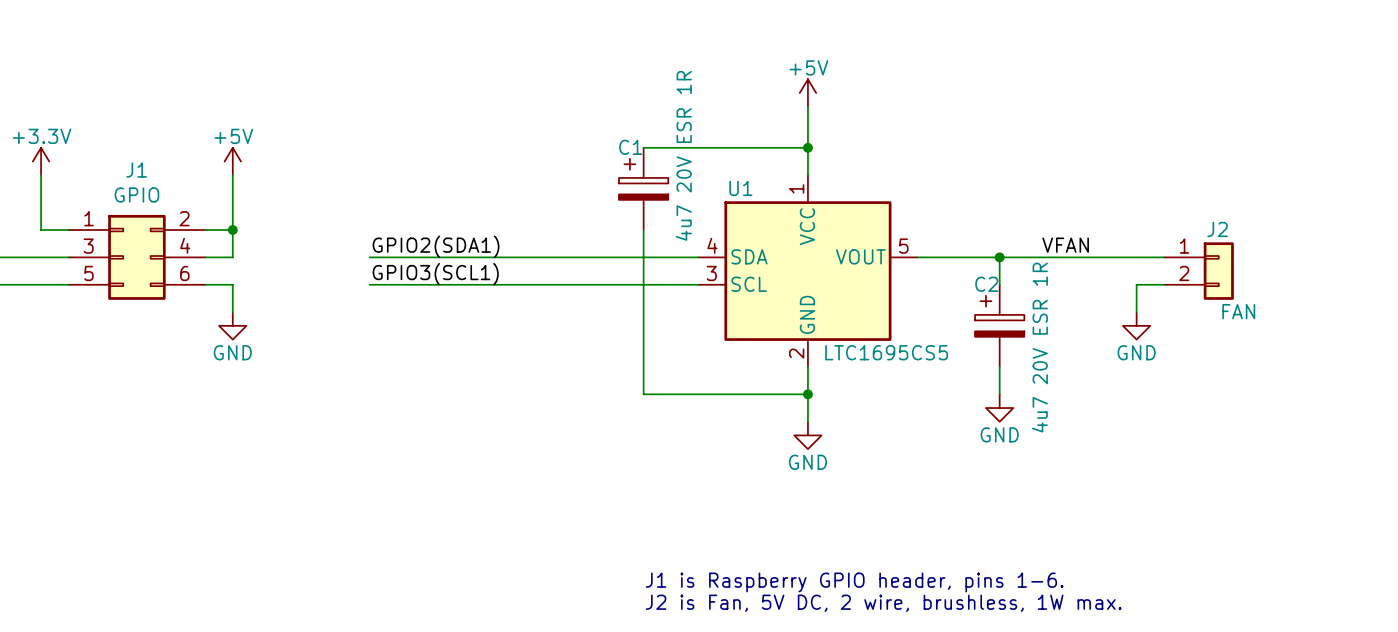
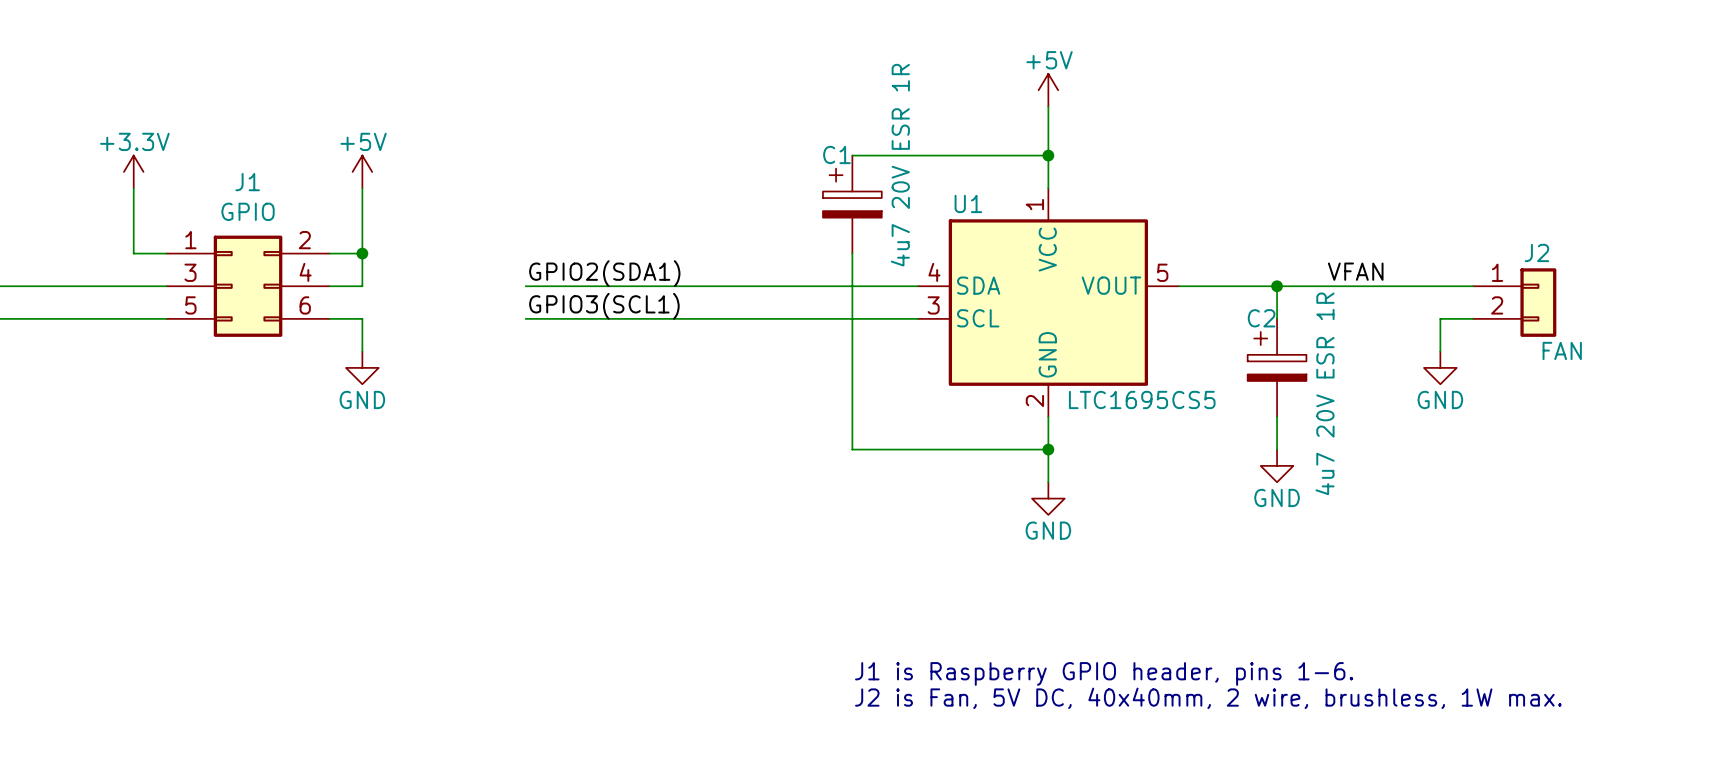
text: J2 is Fan, 5V DC, 2 wire, brushless, 1W max. (883, 603) -> J2 is Fan, 5V DC, 40x40mm, 2 wire, brushless, 1W max. (1208, 698)

